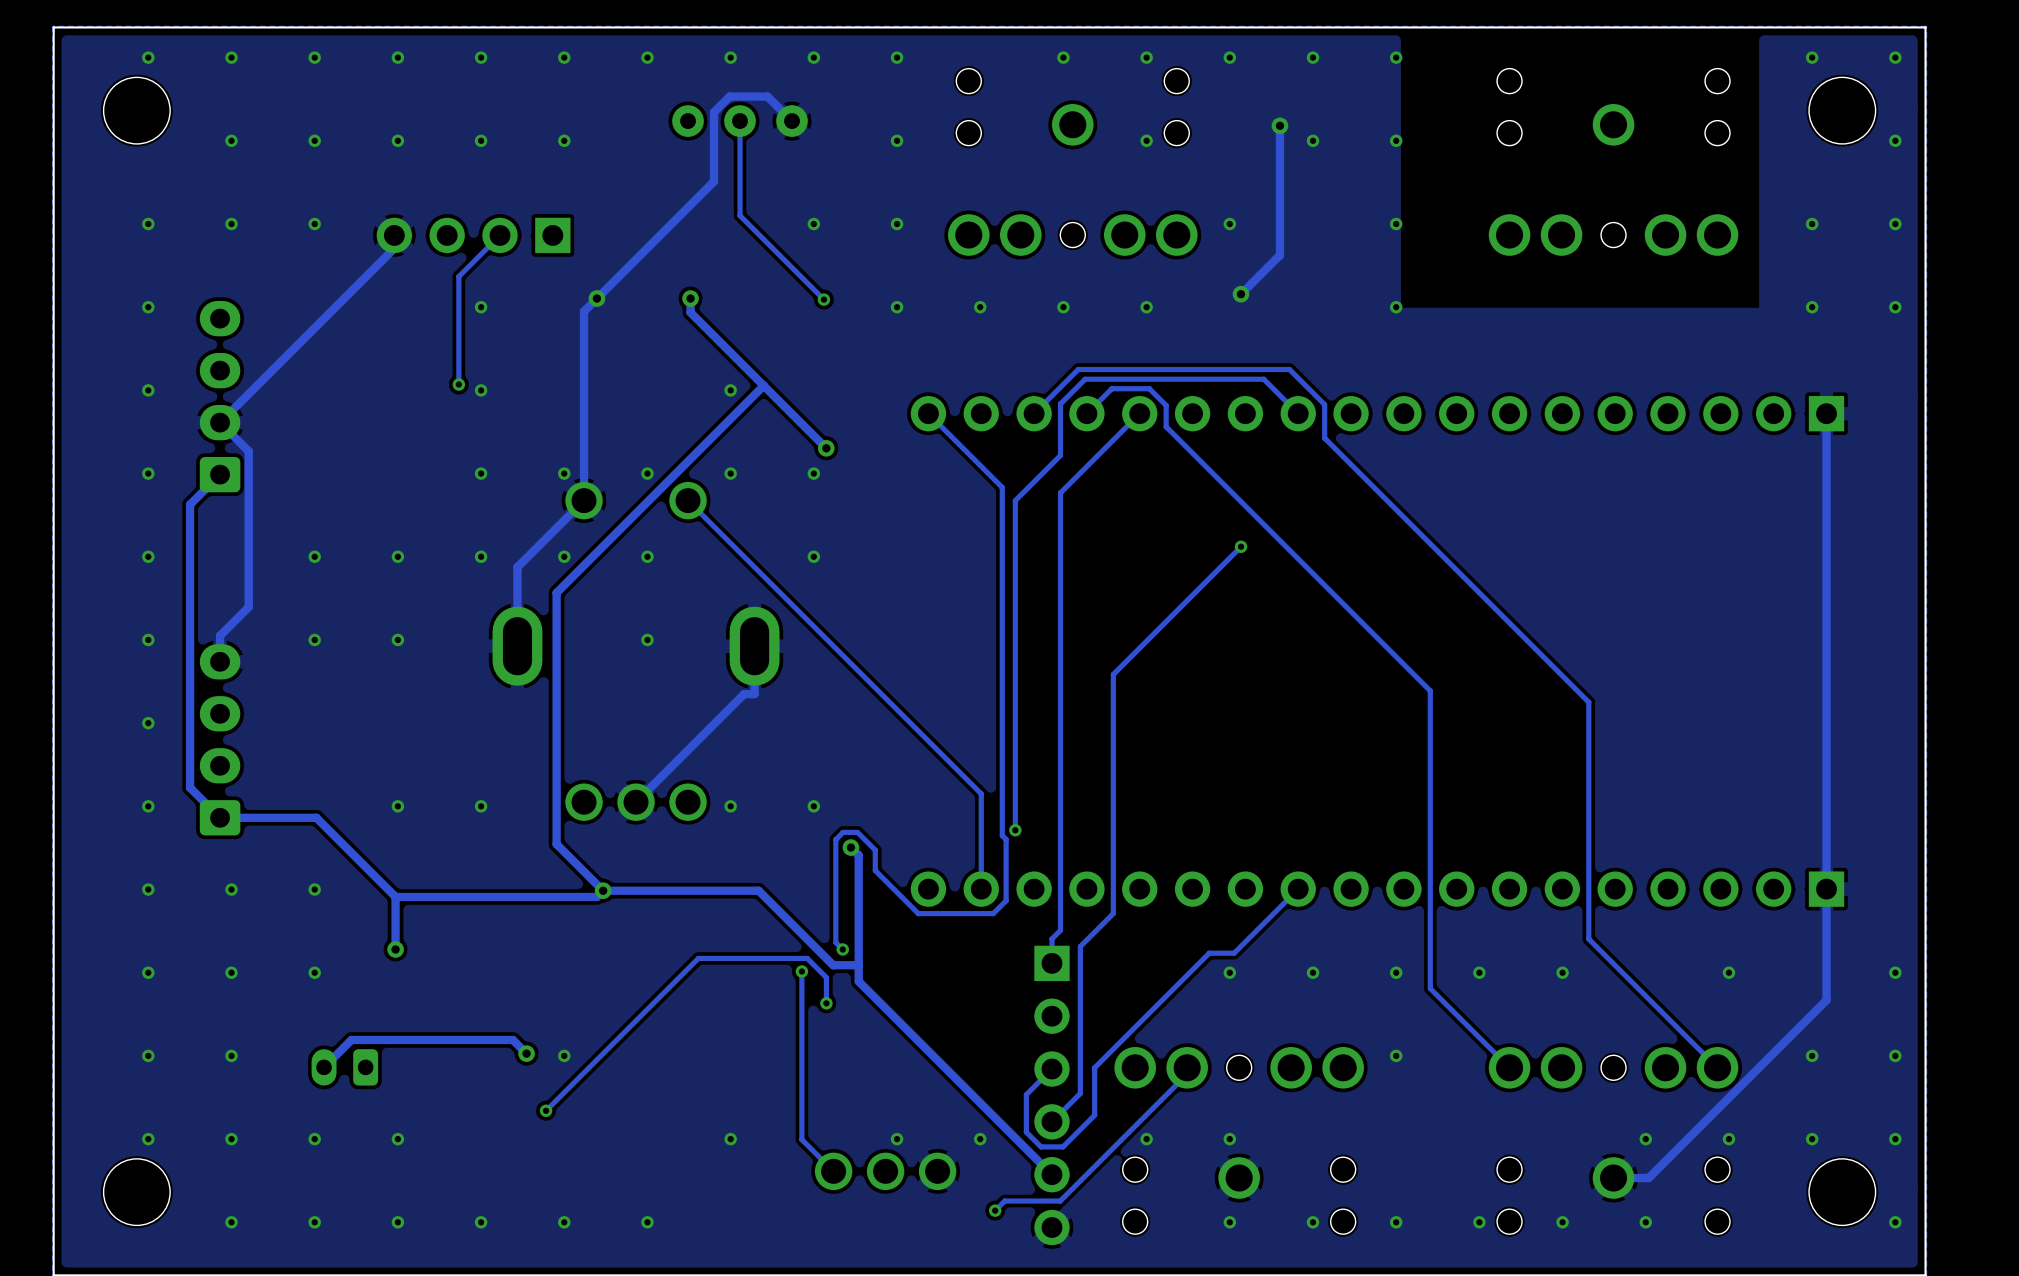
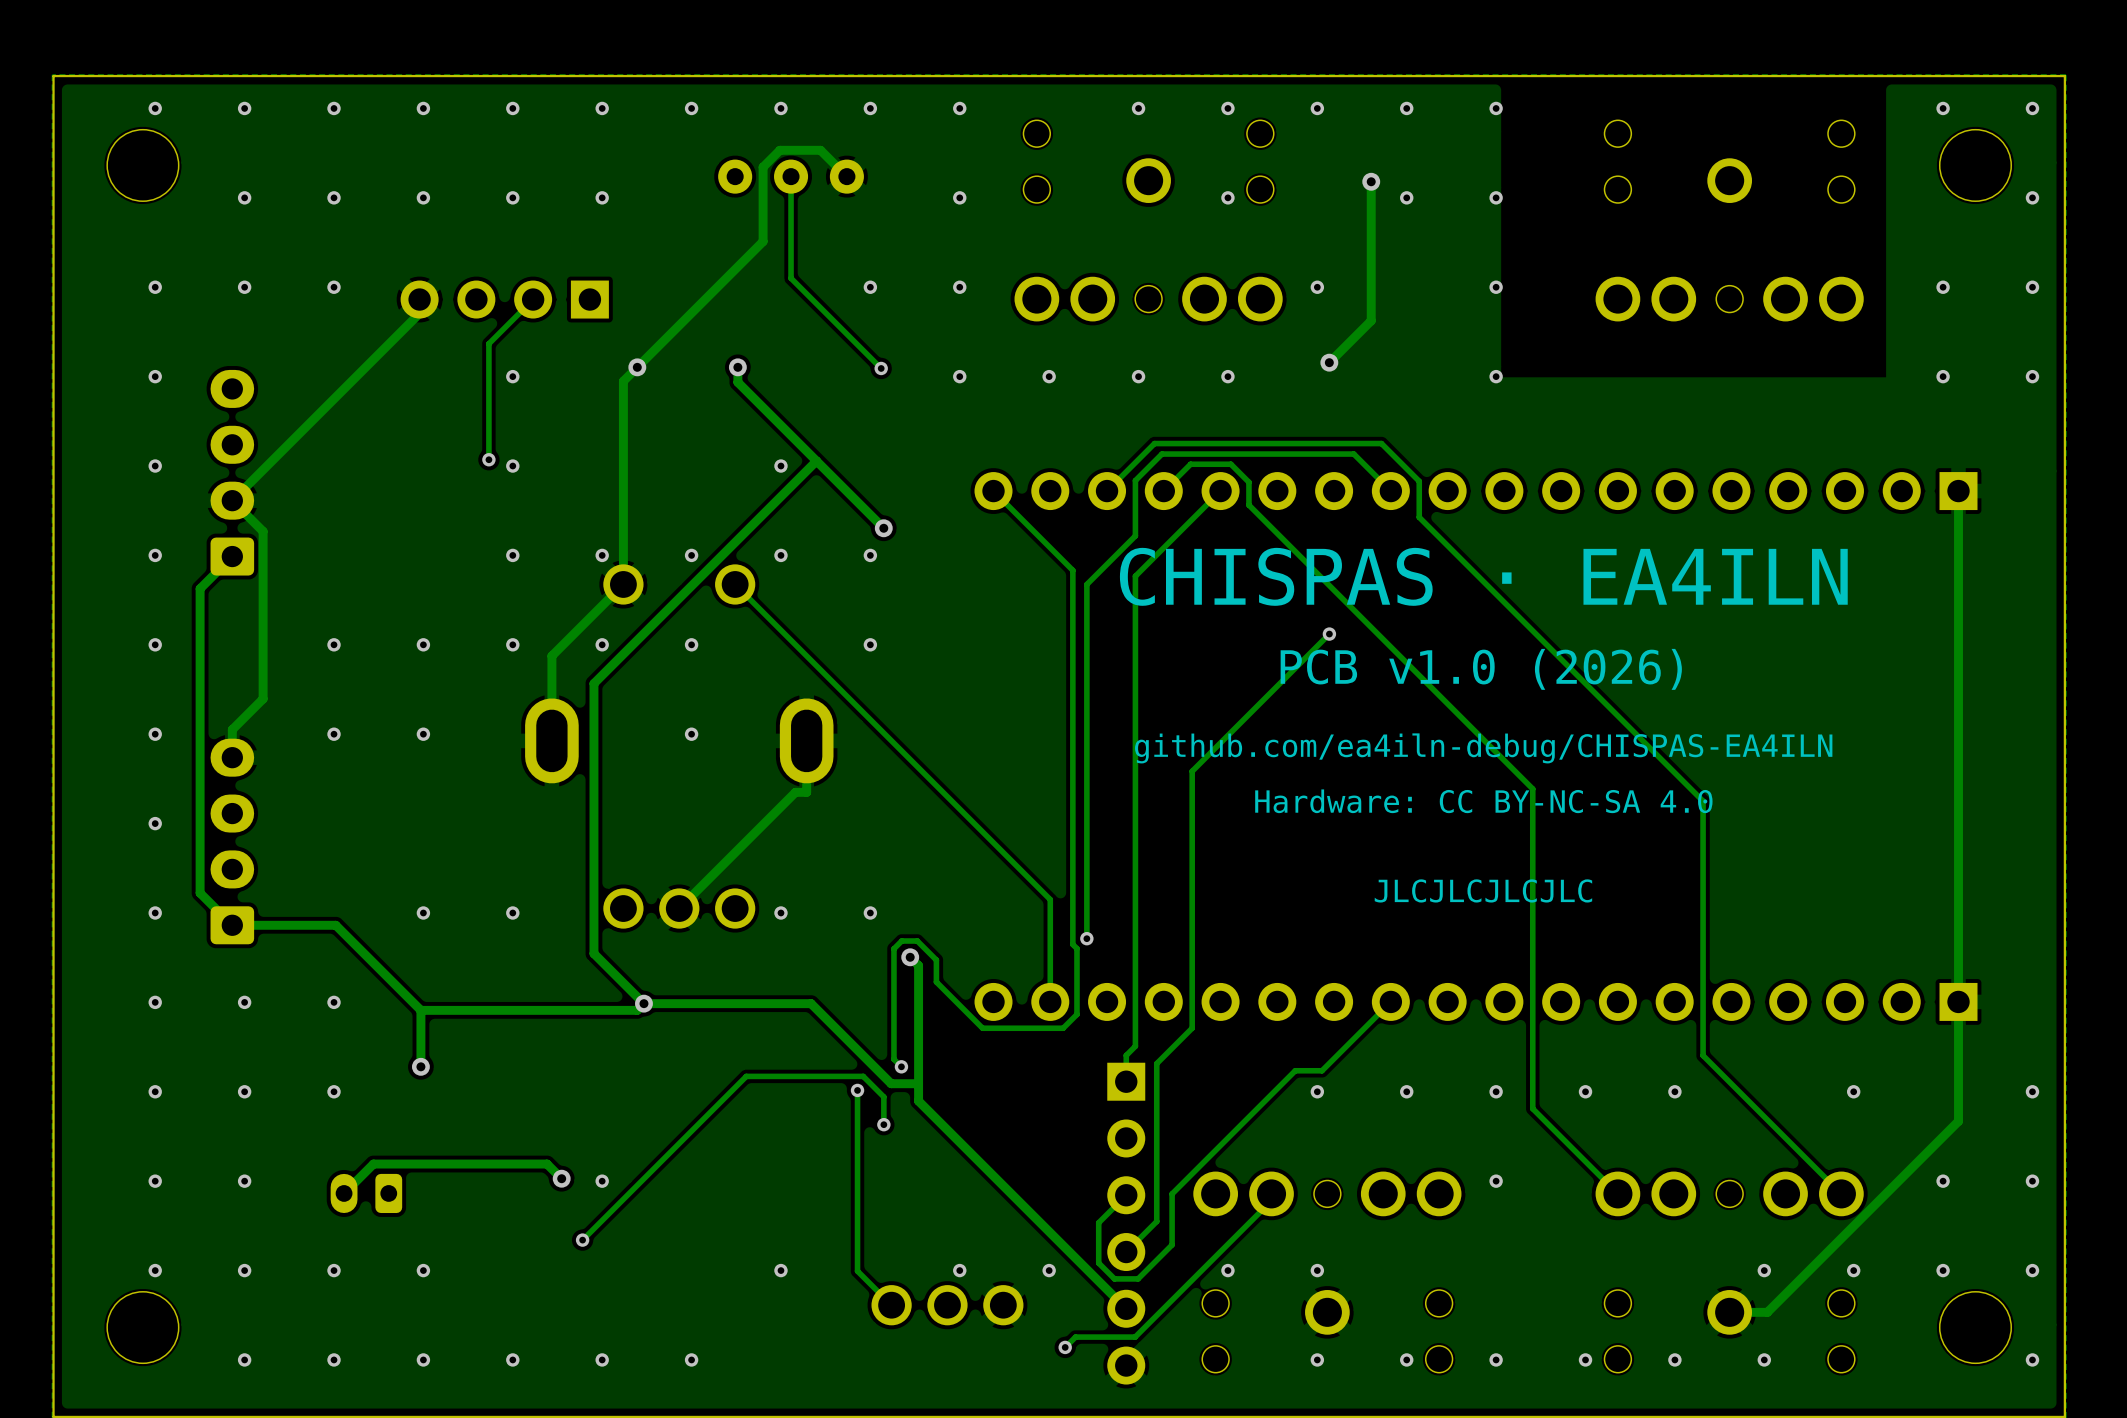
text: none -> CHISPAS · EA4ILN (1483, 576)
text: none -> PCB v1.0 (2026) (1481, 669)
text: none -> github.com/ea4iln-debug/CHISPAS-EA4ILN (1483, 748)
text: none -> Hardware: CC BY-NC-SA 4.0 (1483, 801)
text: none -> JLCJLCJLCJLC (1483, 890)

